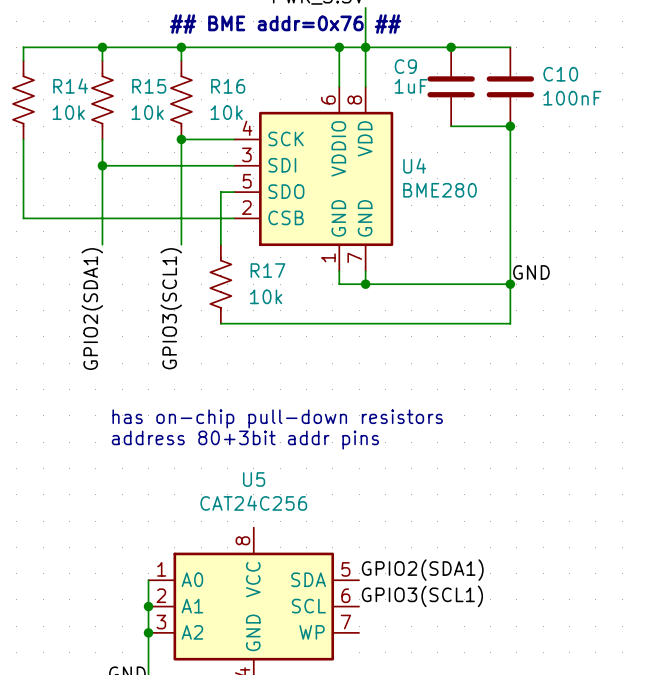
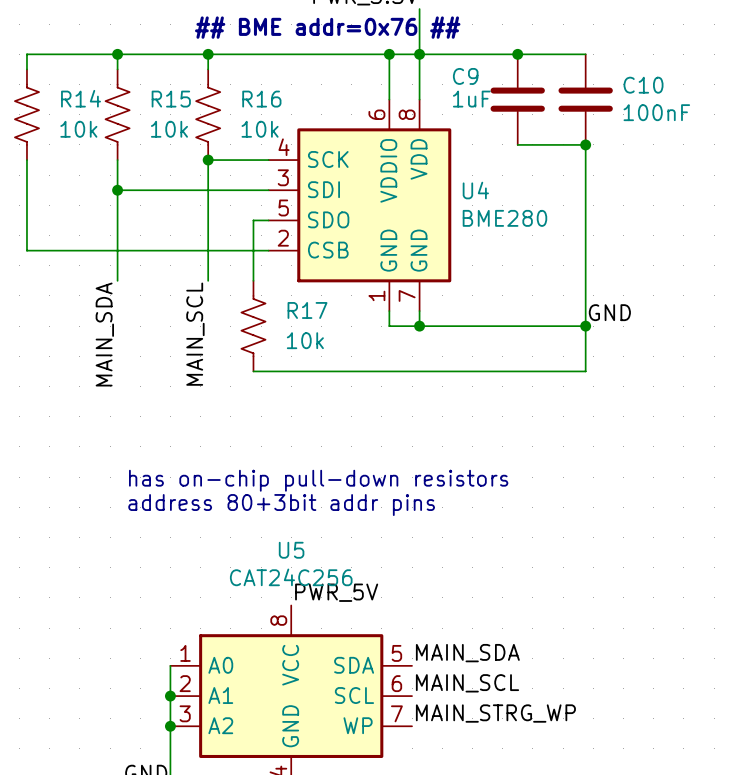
label: GPIO3(SCL1) (171, 308) -> MAIN_SCL (195, 334)
label: GPIO2(SDA1) (92, 309) -> MAIN_SDA (104, 334)
label: none -> PWR_5V (336, 592)
label: GPIO2(SDA1) (422, 570) -> MAIN_SDA (467, 653)
label: GPIO3(SCL1) (422, 596) -> MAIN_SCL (467, 683)
label: none -> MAIN_STRG_WP (495, 713)

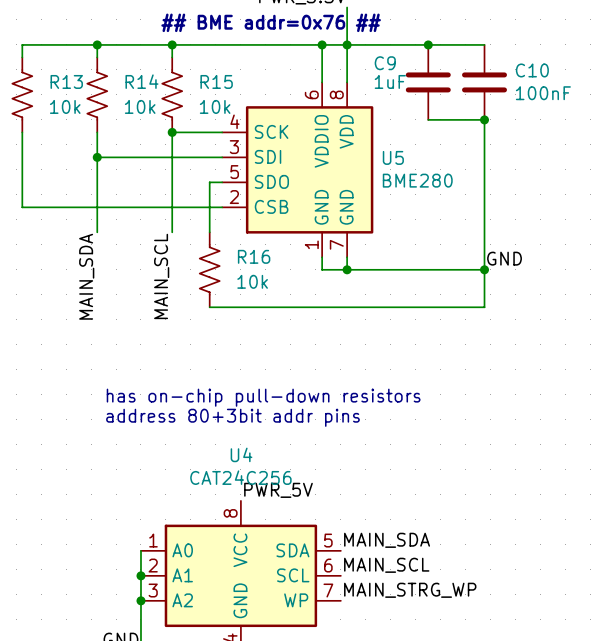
R14 name: R14 (81, 98) -> R13 (66, 81)
R15 name: R15 (171, 99) -> R14 (141, 81)
R16 name: R16 (261, 99) -> R15 (216, 81)
U4 name: U4 (475, 190) -> U5 (393, 157)
R17 name: R17 (307, 310) -> R16 (254, 256)
U5 name: U5 (291, 550) -> U4 (241, 454)

